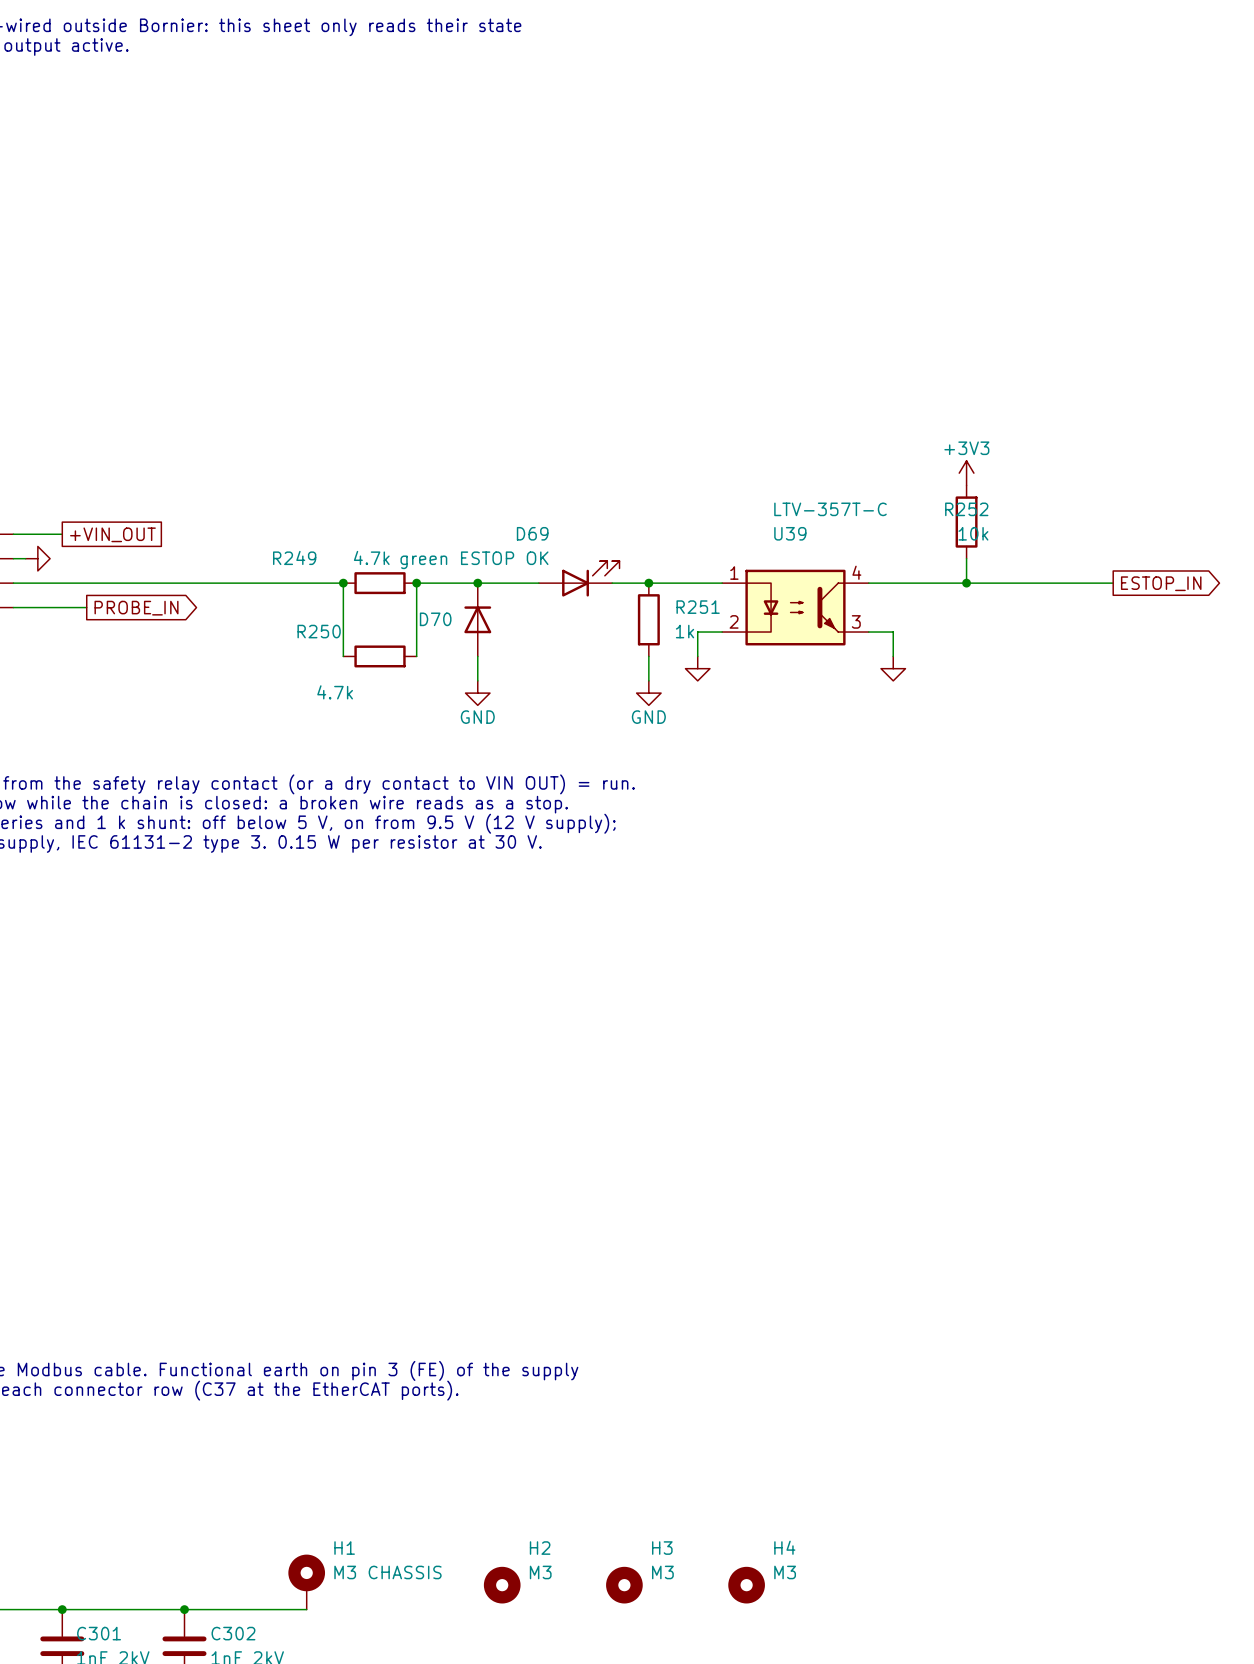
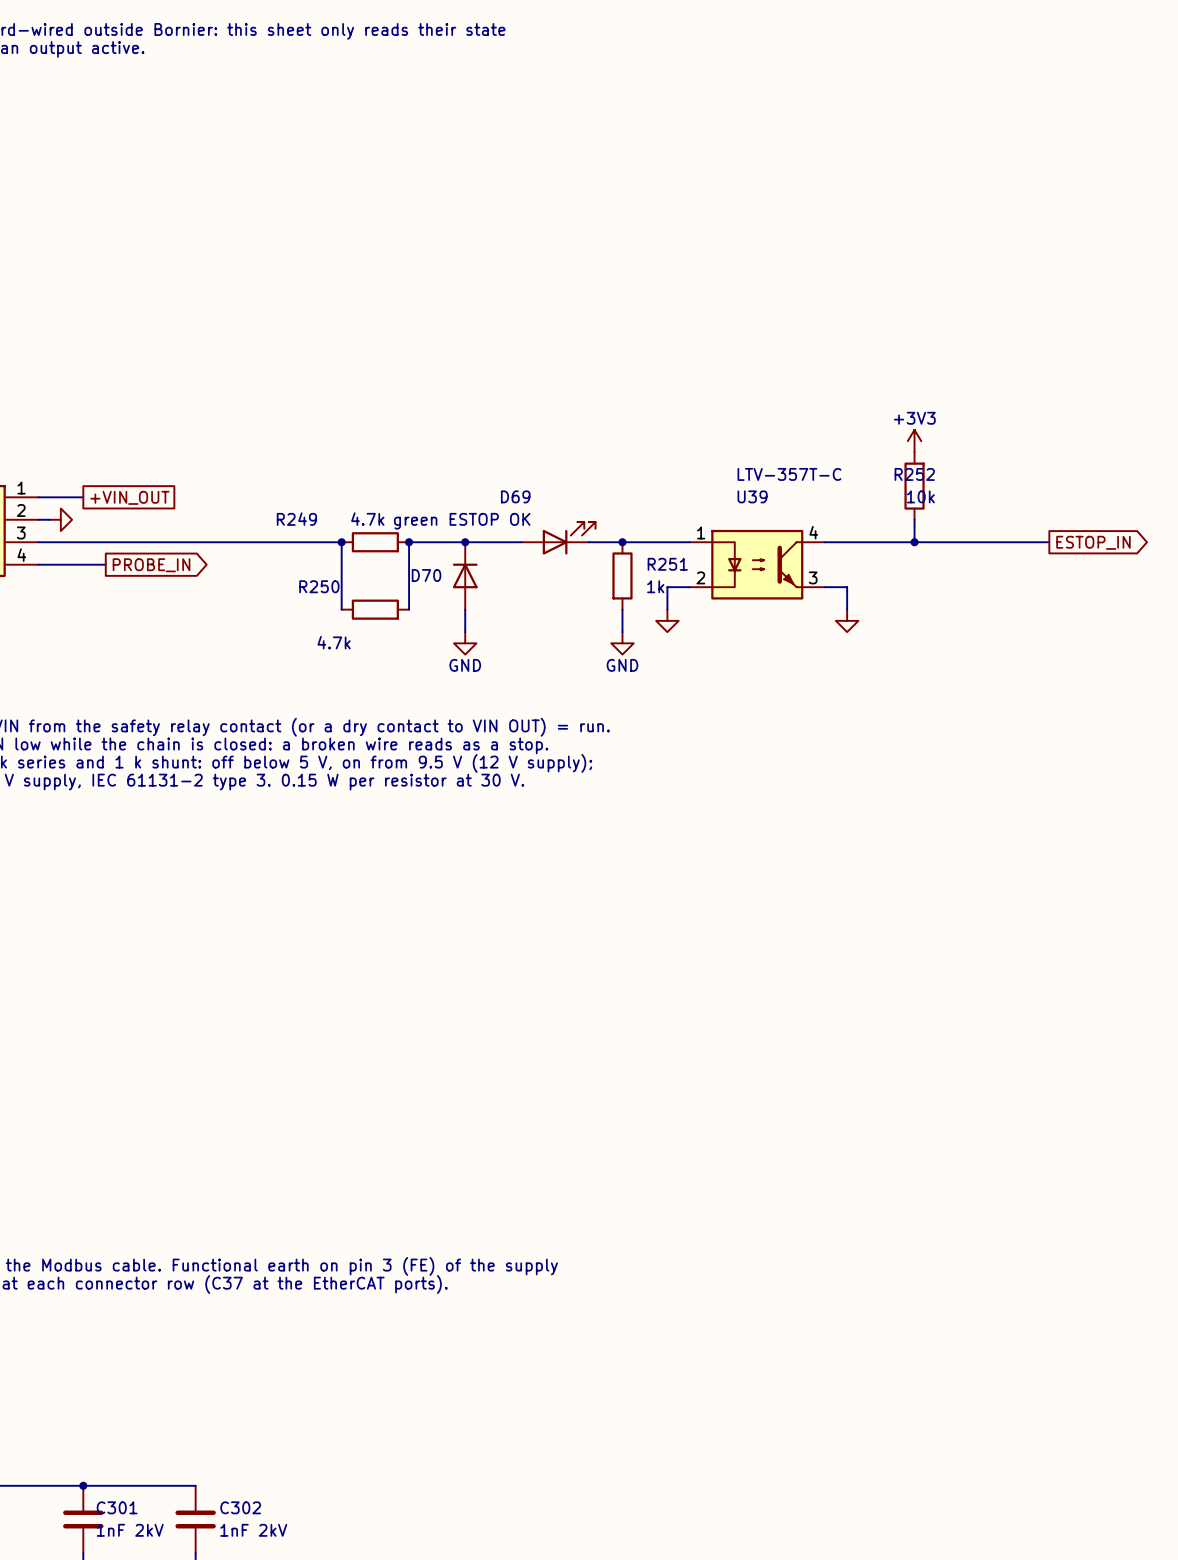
H1: M3 CHASSIS (306, 1582) -> none
H2: M3 (502, 1585) -> none
H3: M3 (624, 1585) -> none
H4: M3 (746, 1585) -> none
wire: (184, 1609) (306, 1609) -> none
junction: (184, 1609) -> none

